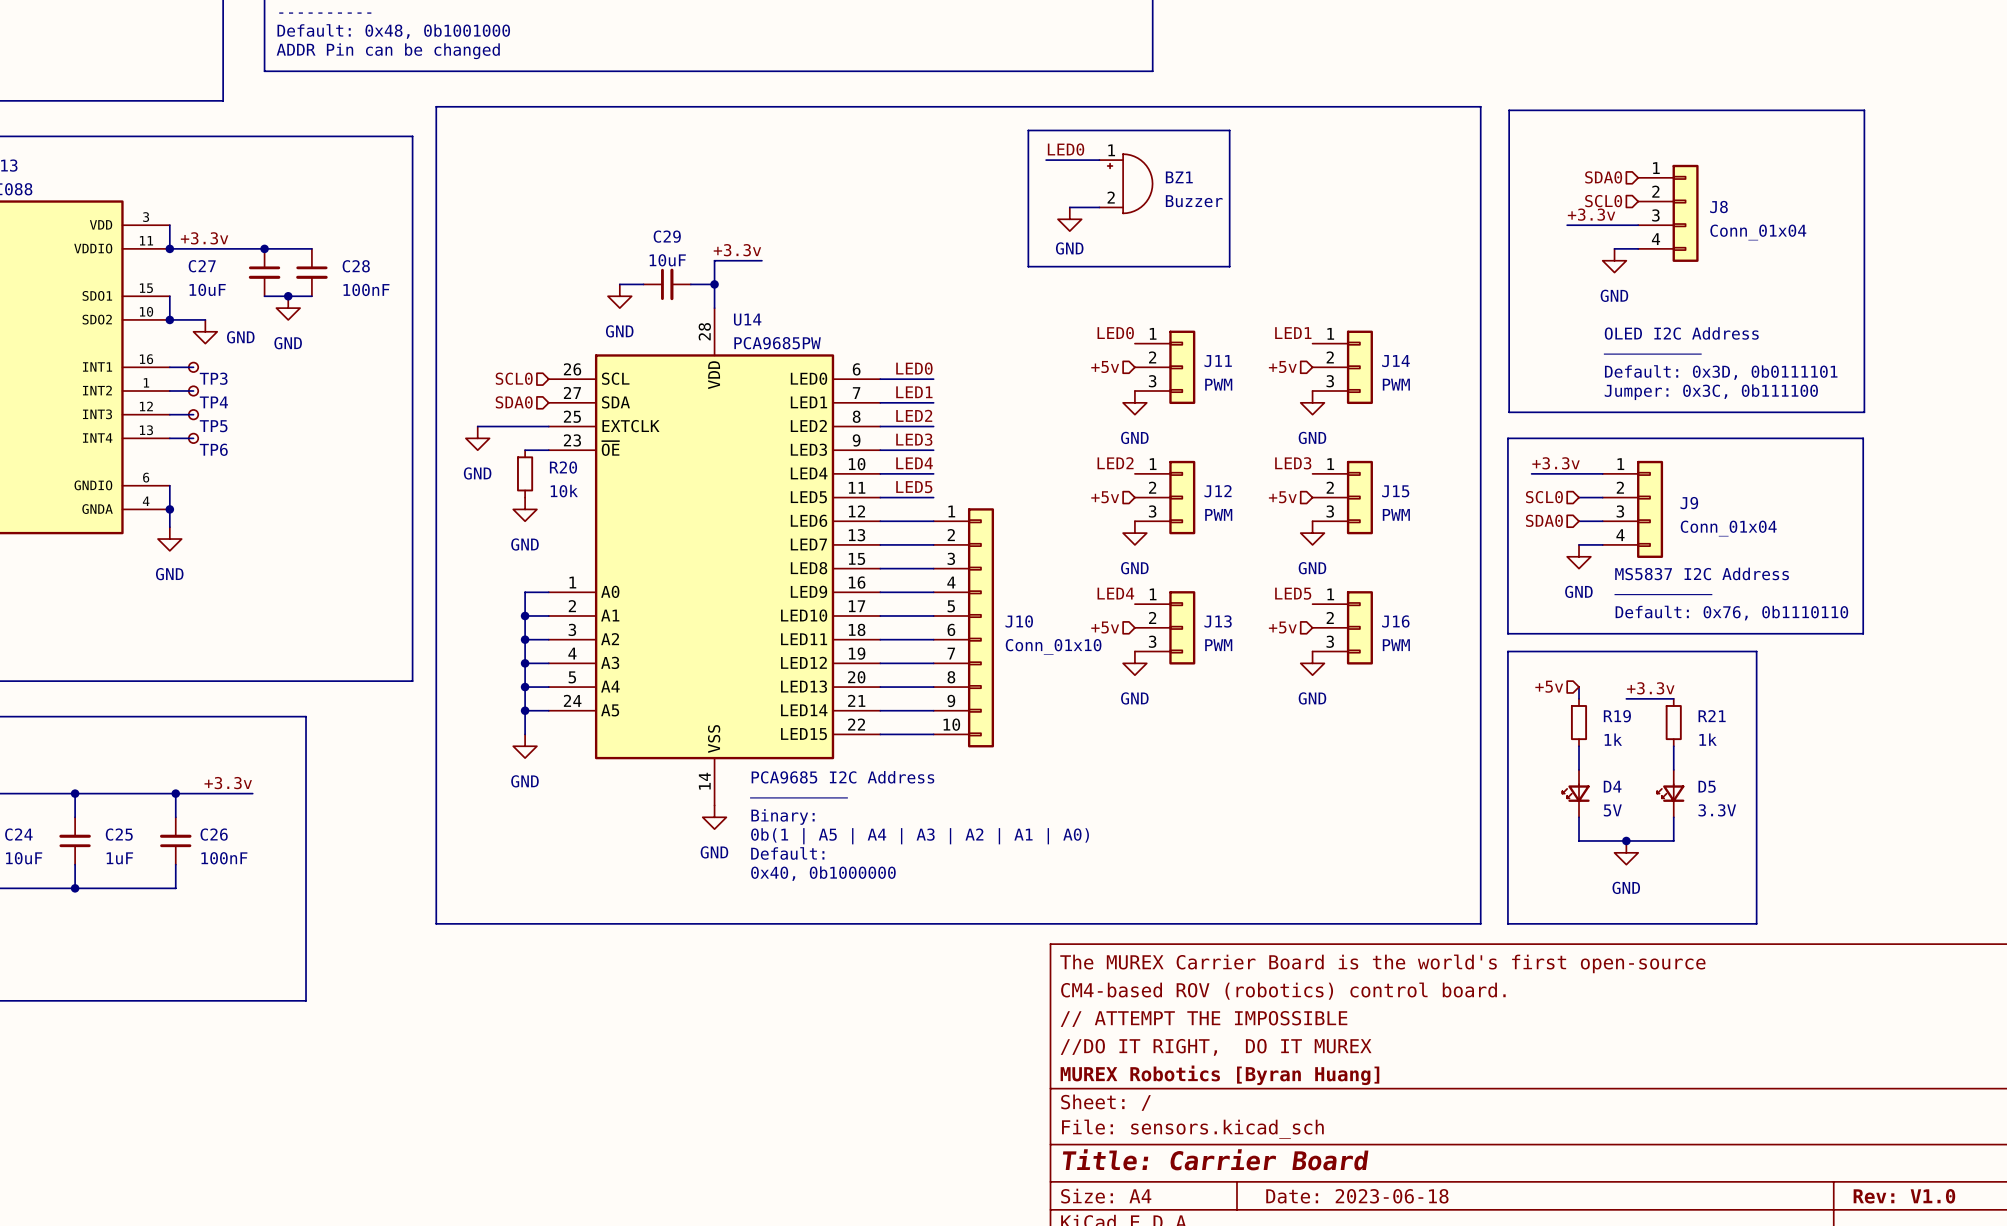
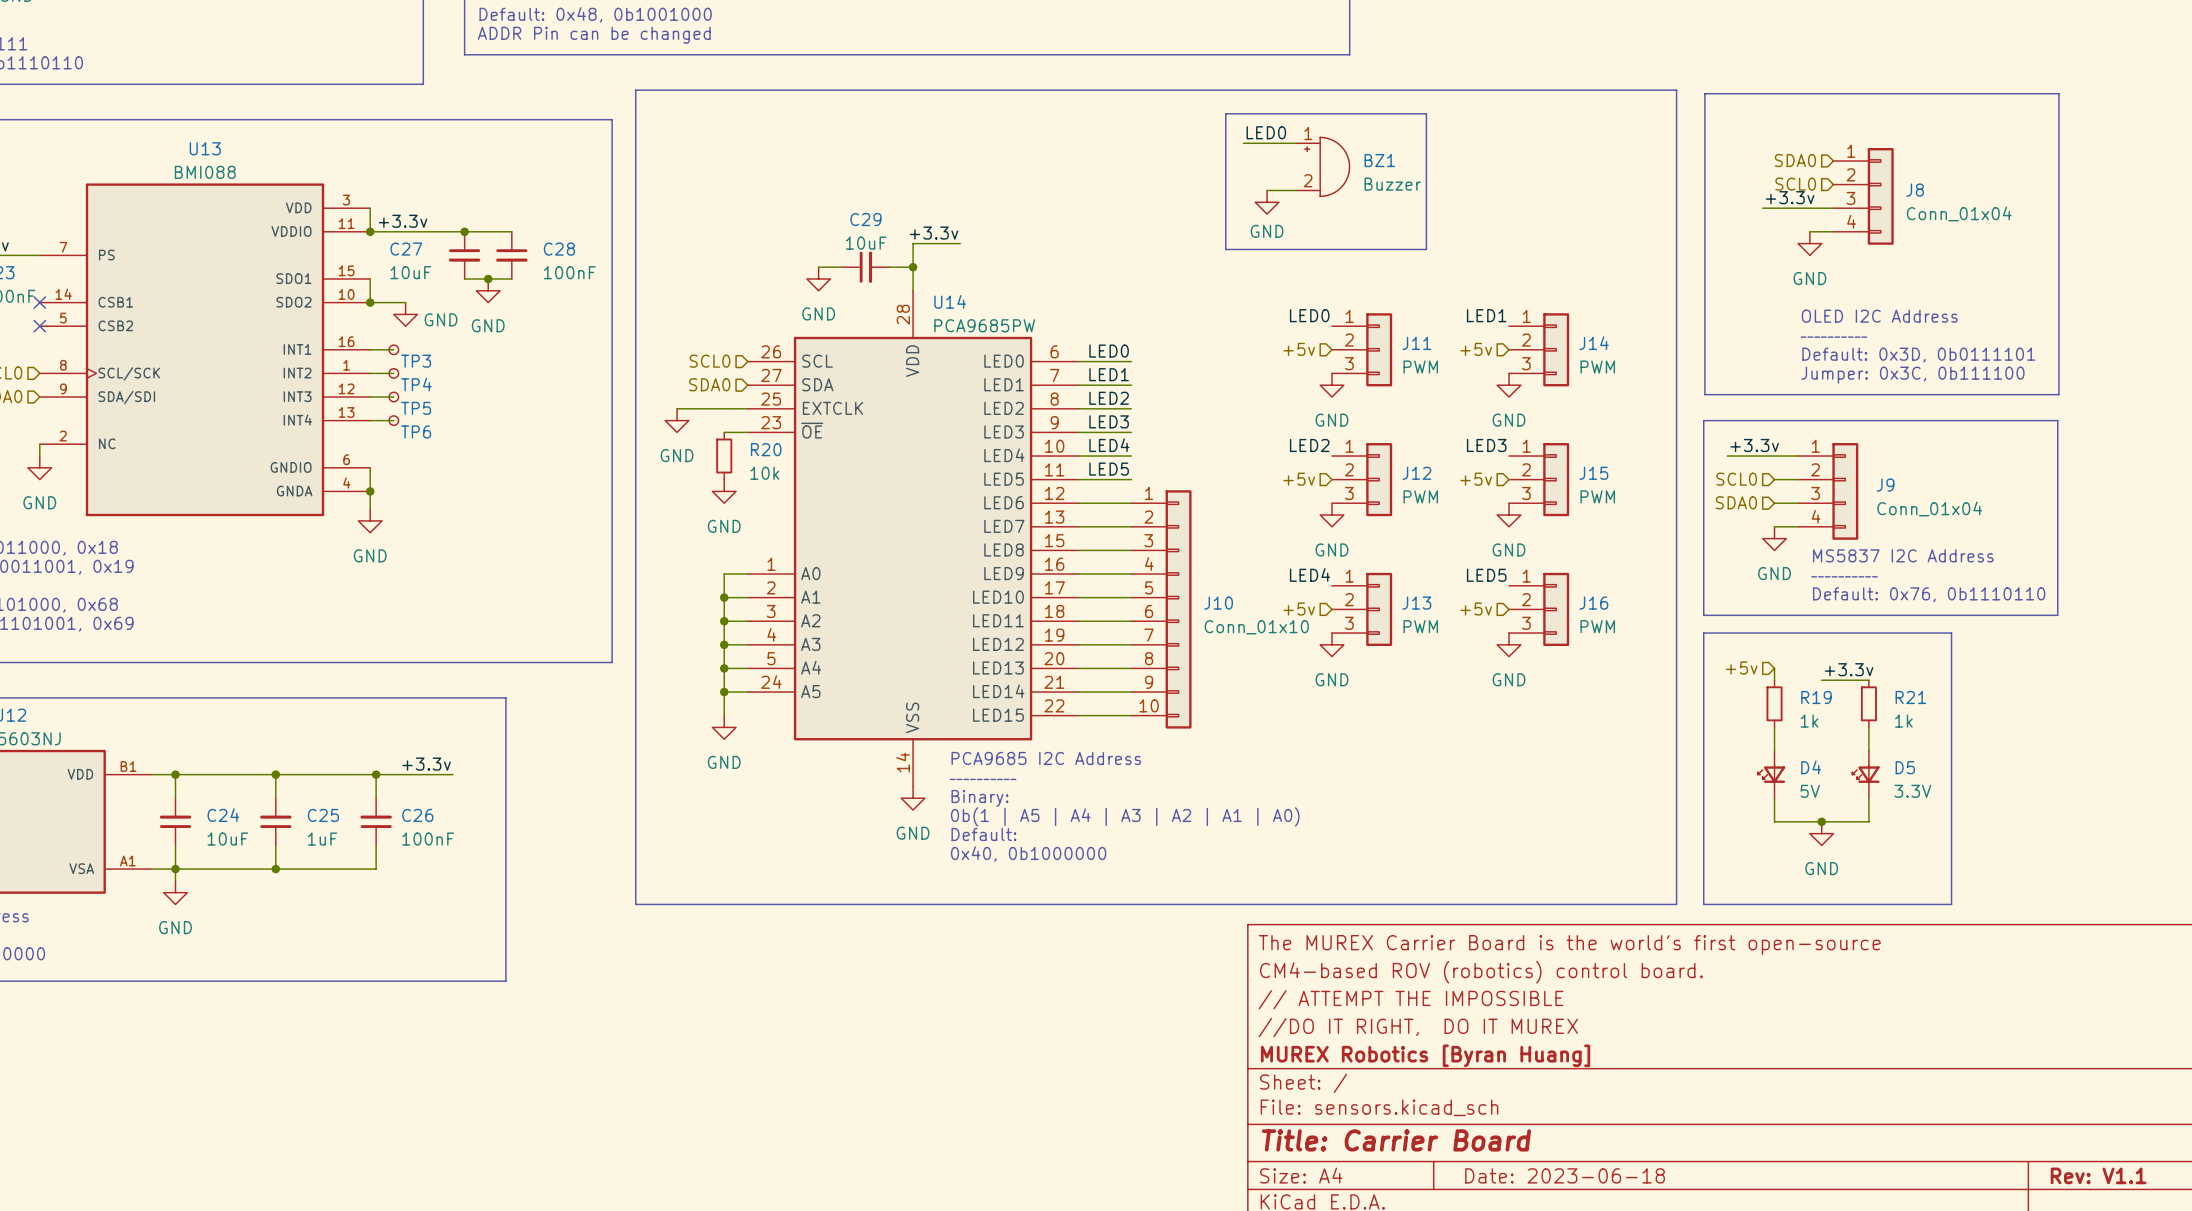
title block: Rev: V1.0 (1904, 1196) -> Rev: V1.1 (2098, 1175)

